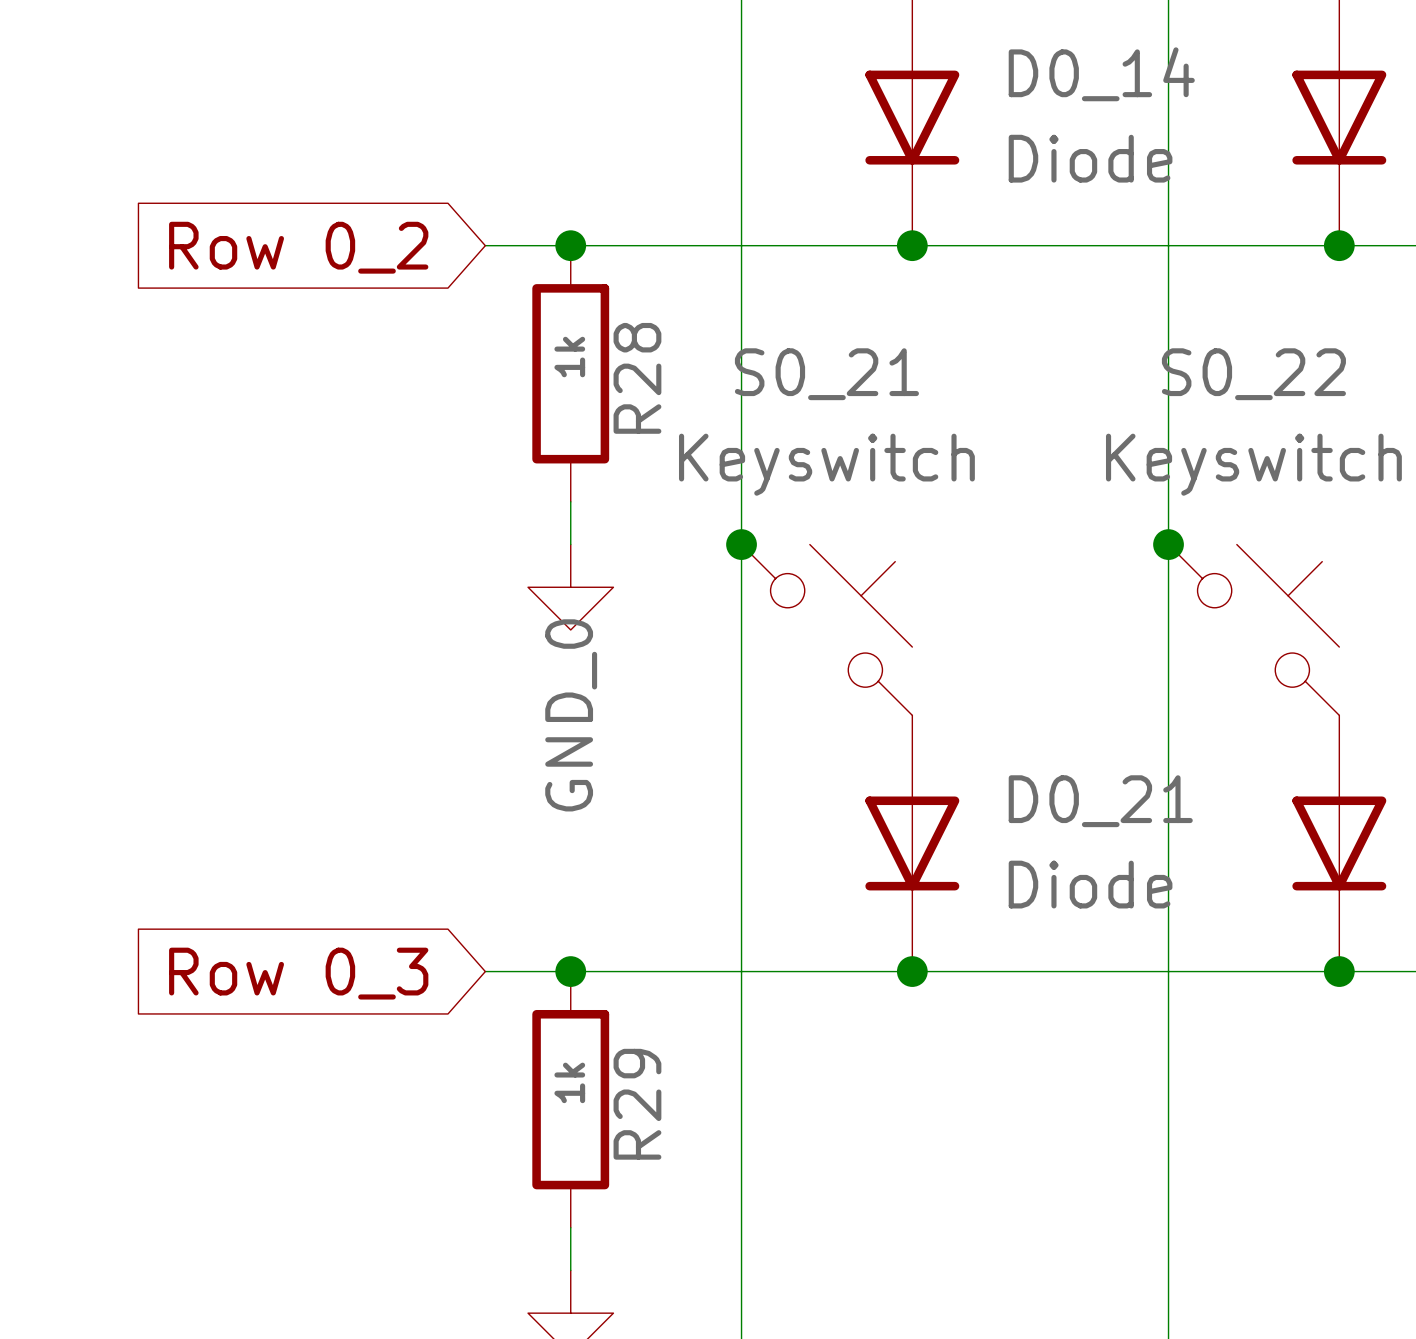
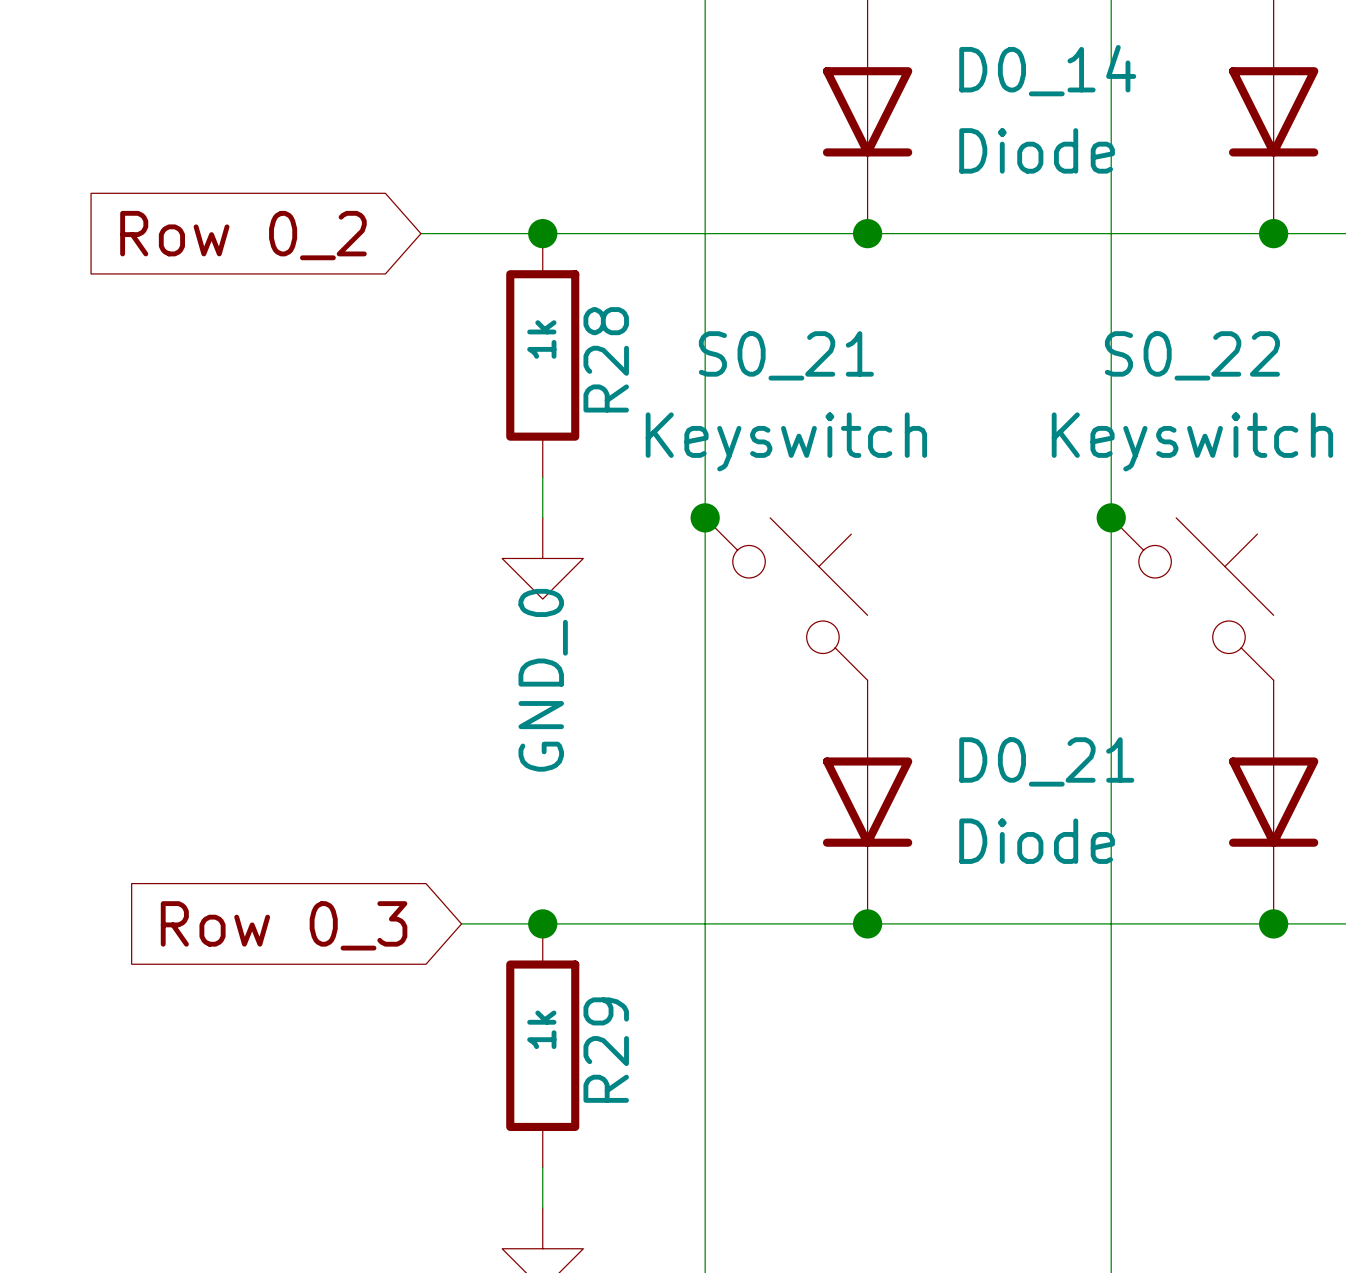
wire: none -> (420, 233) (461, 233)
global label position: Row 0_2 (298, 247) -> Row 0_2 (243, 235)

